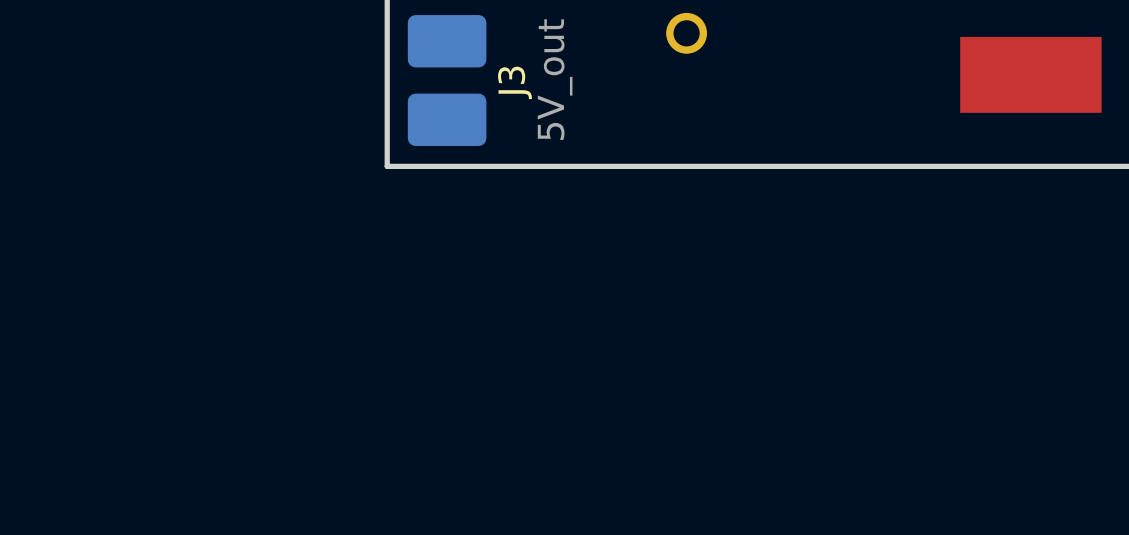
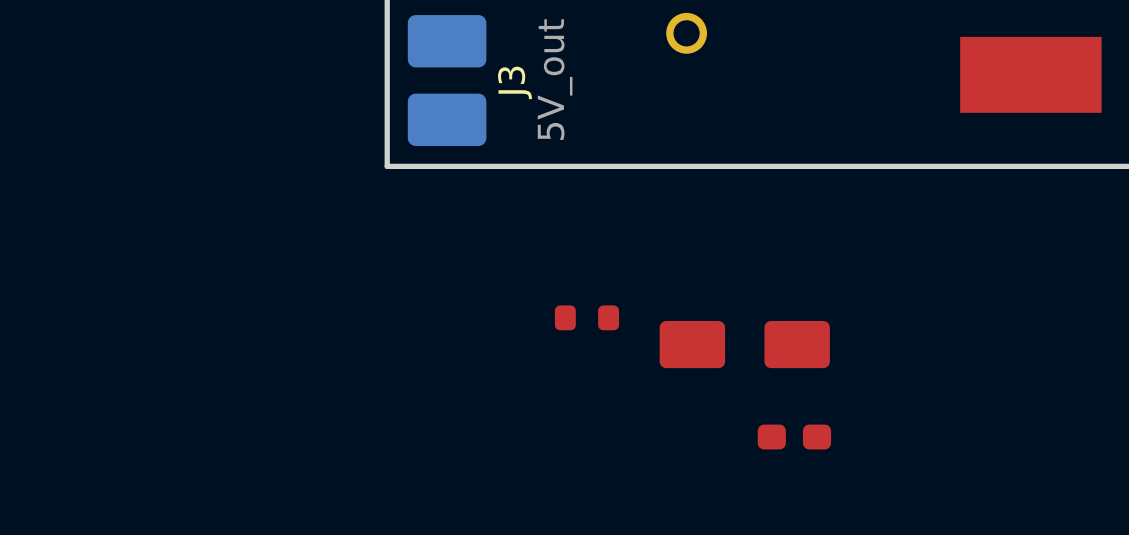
part: none -> (586, 317)
part: none -> (744, 344)
part: none -> (794, 437)

